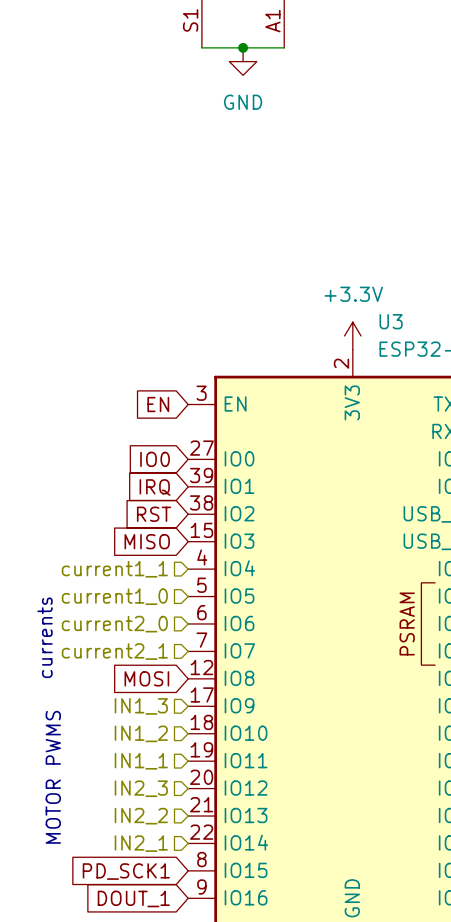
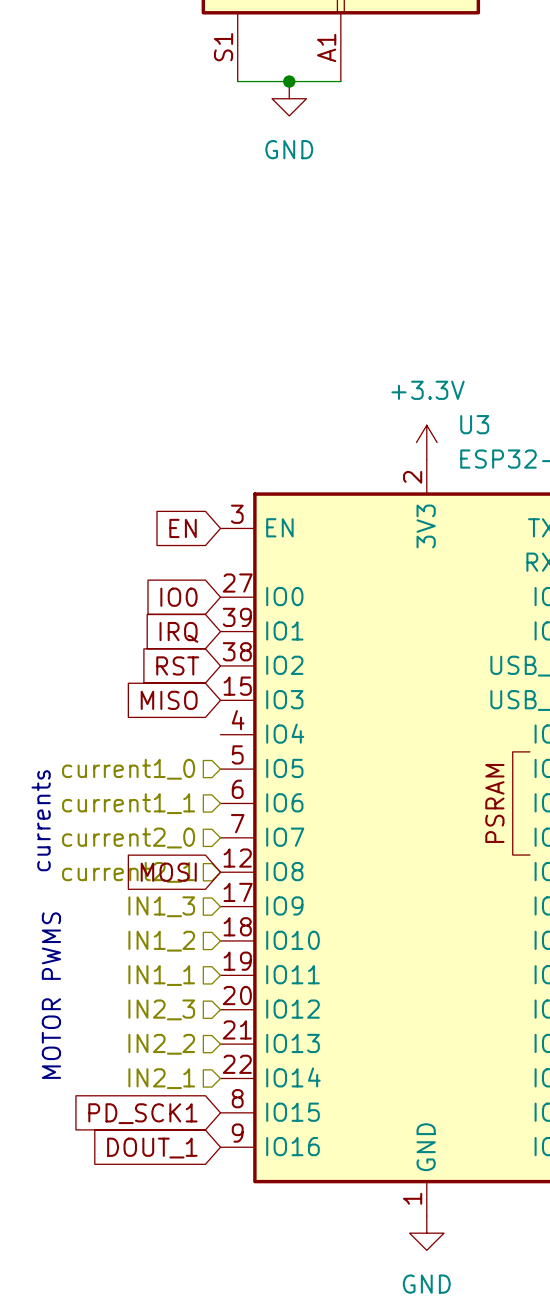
hierarchical label: current1_1 (114, 569) -> none
hierarchical label: current2_0 (114, 624) -> current1_1 (128, 803)
hierarchical label: current2_1 (114, 651) -> current2_0 (128, 838)
hierarchical label: none -> current2_1 (128, 872)

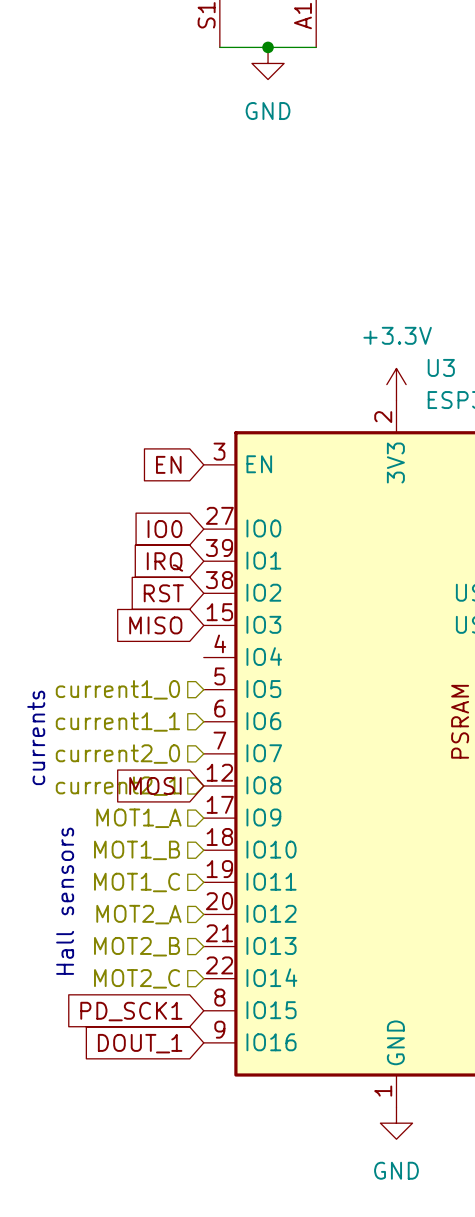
hierarchical label: IN1_3 (161, 906) -> MOT1_A (138, 818)
hierarchical label: IN1_2 (161, 941) -> MOT1_B (137, 850)
hierarchical label: IN1_1 (161, 975) -> MOT1_C (137, 882)
text: MOTOR PWMS (51, 995) -> none
text: none -> Hall sensors (65, 901)
hierarchical label: IN2_3 (161, 1009) -> MOT2_A (138, 914)
hierarchical label: IN2_2 (161, 1044) -> MOT2_B (137, 946)
hierarchical label: IN2_1 (161, 1078) -> MOT2_C (137, 978)

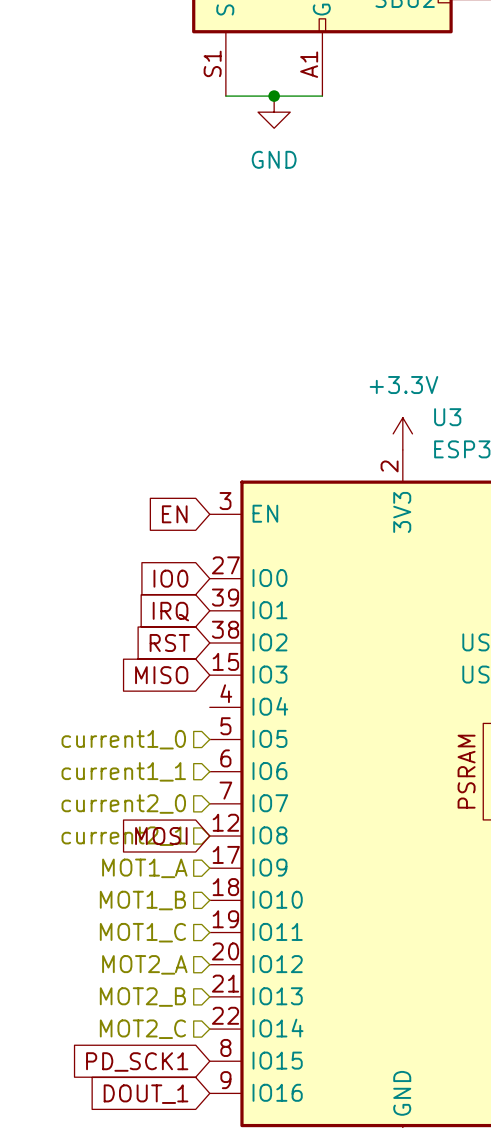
text: currents (36, 737) -> none
text: Hall sensors (65, 901) -> none

